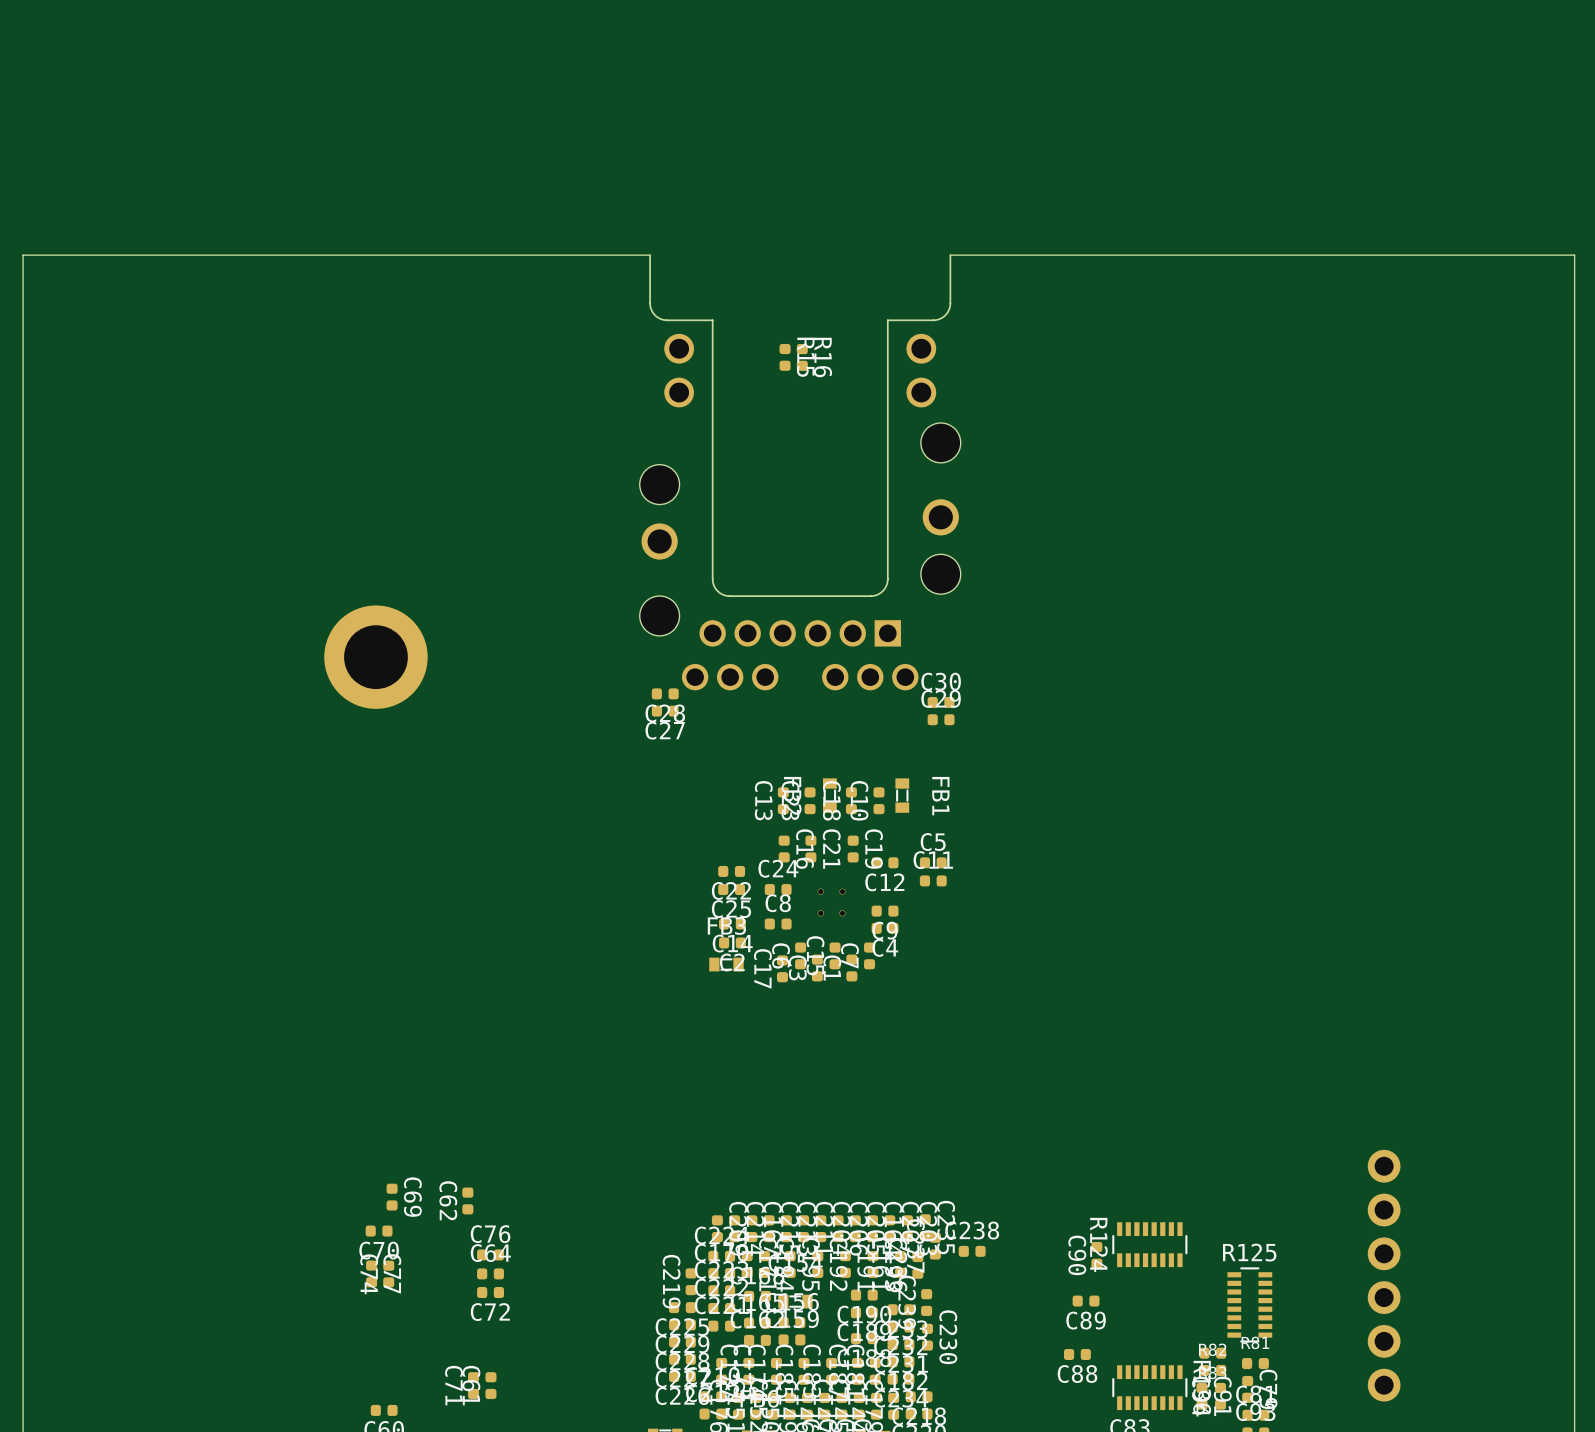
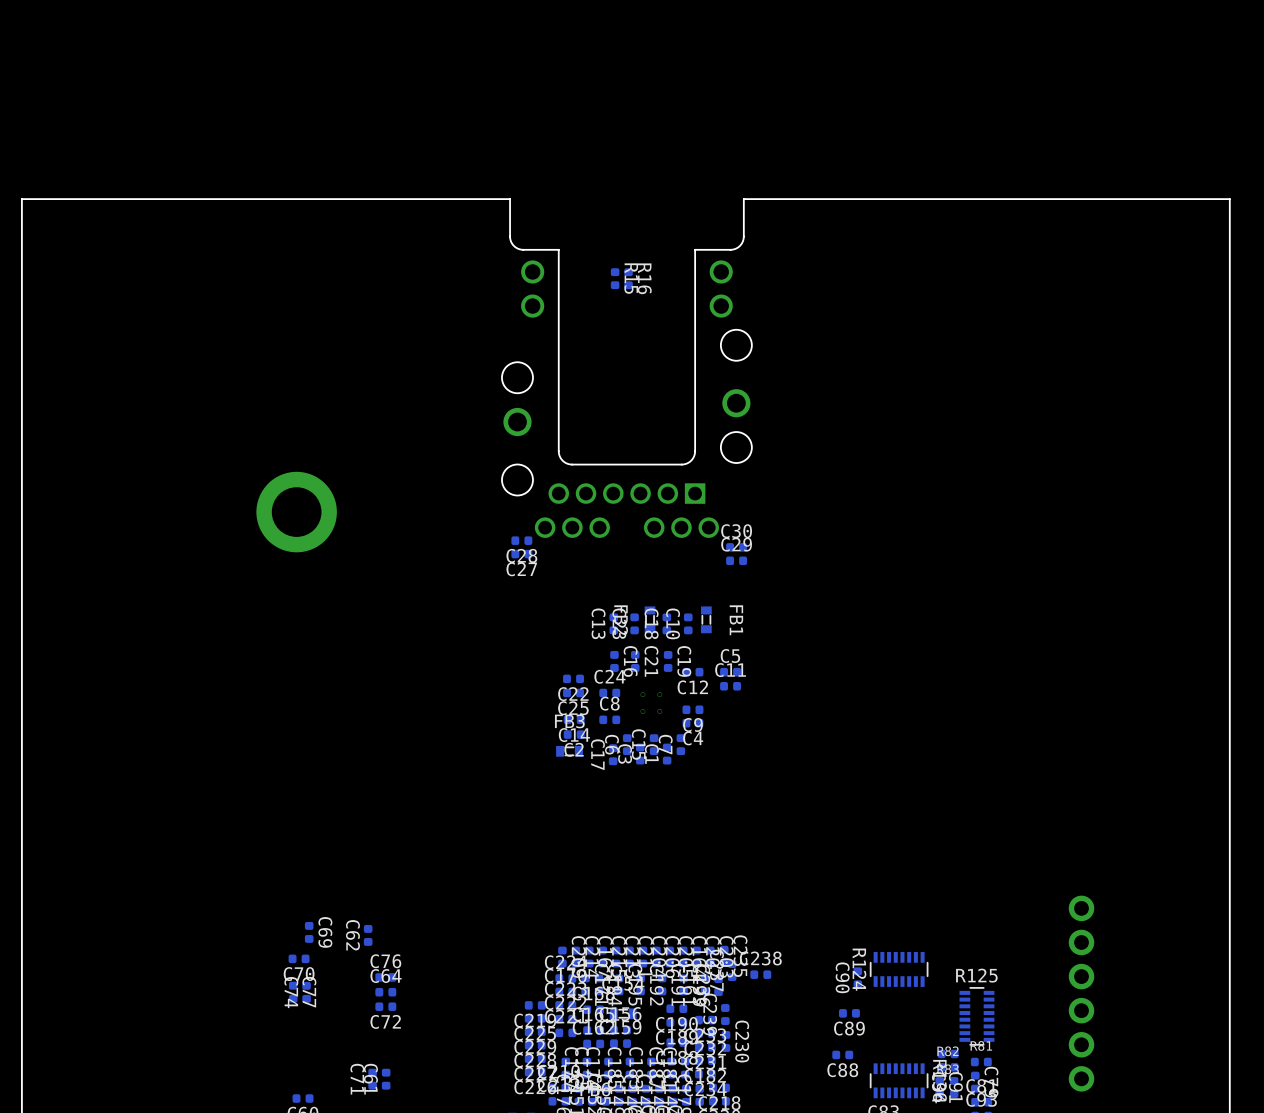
C219 rotation: 0° (691, 1281) -> 90° clockwise (535, 1005)

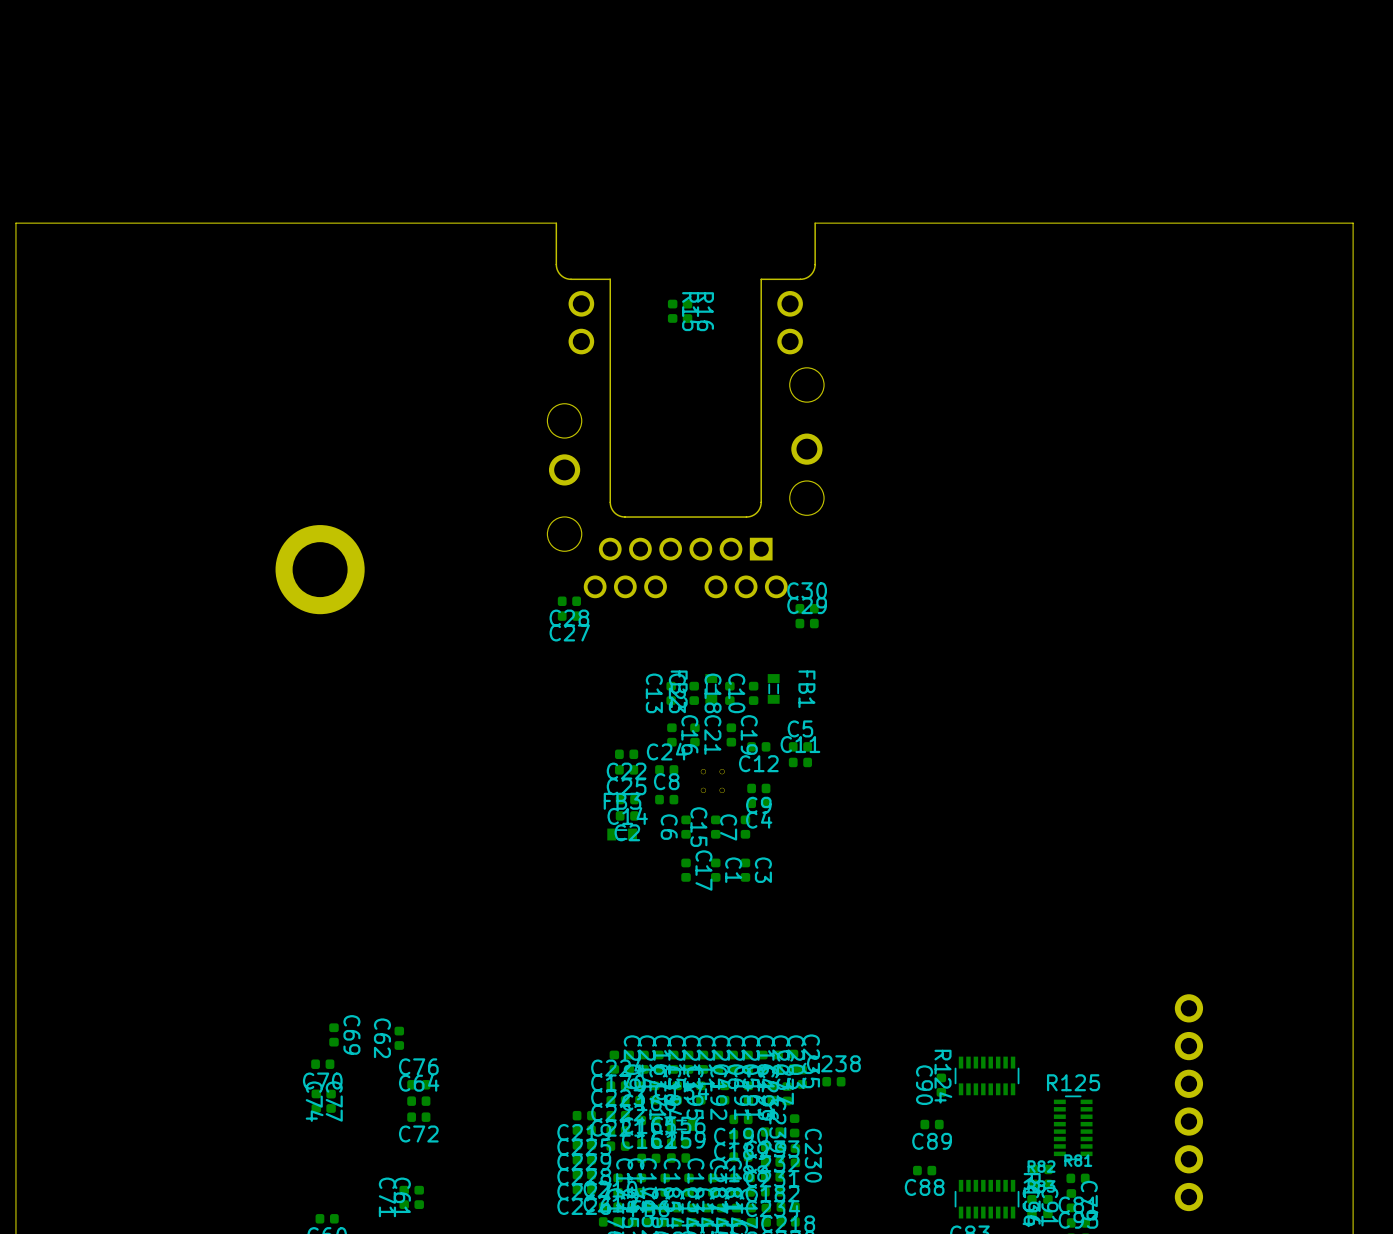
C3 name position: C3 (625, 753) -> C3 (763, 870)
C17 name position: C17 (597, 754) -> C17 (703, 870)
C17 position: (613, 754) -> (686, 870)
C3 position: (640, 754) -> (745, 870)
C1 name position: C1 (651, 754) -> C1 (733, 870)
C1 position: (667, 754) -> (715, 870)

